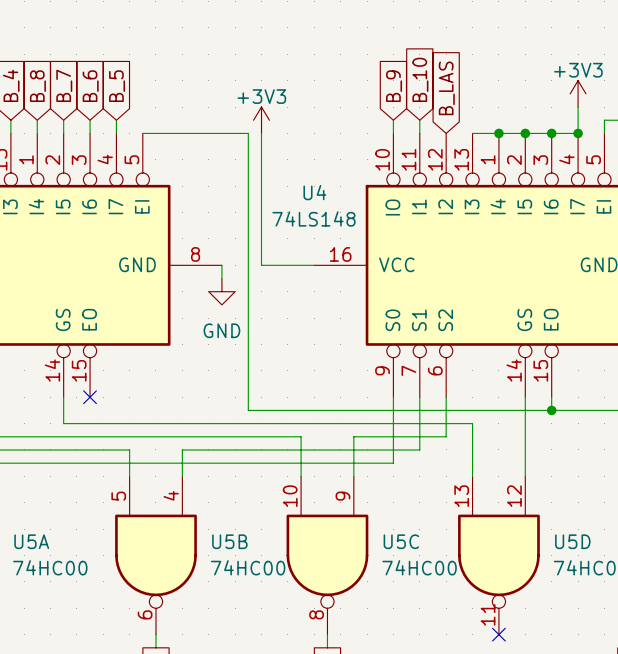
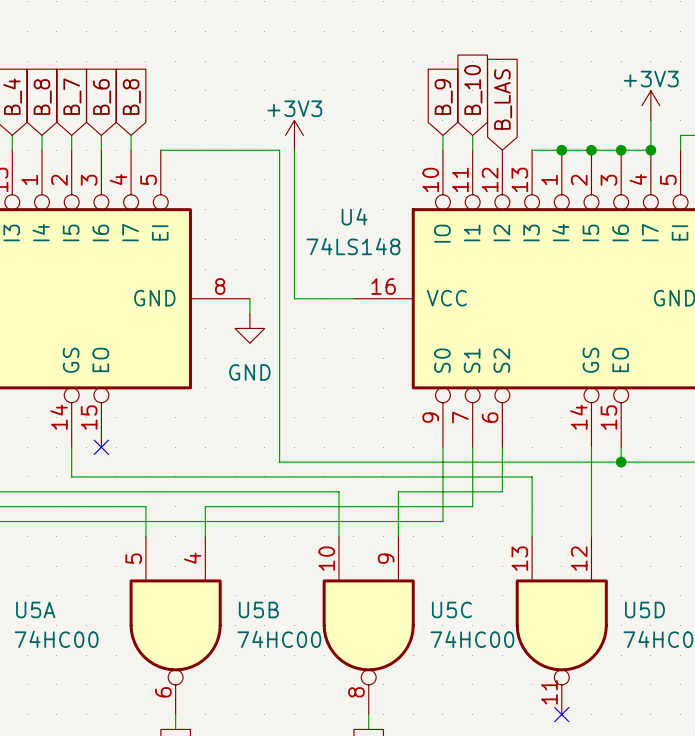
global label: B_5 (117, 86) -> B_8 (131, 97)

